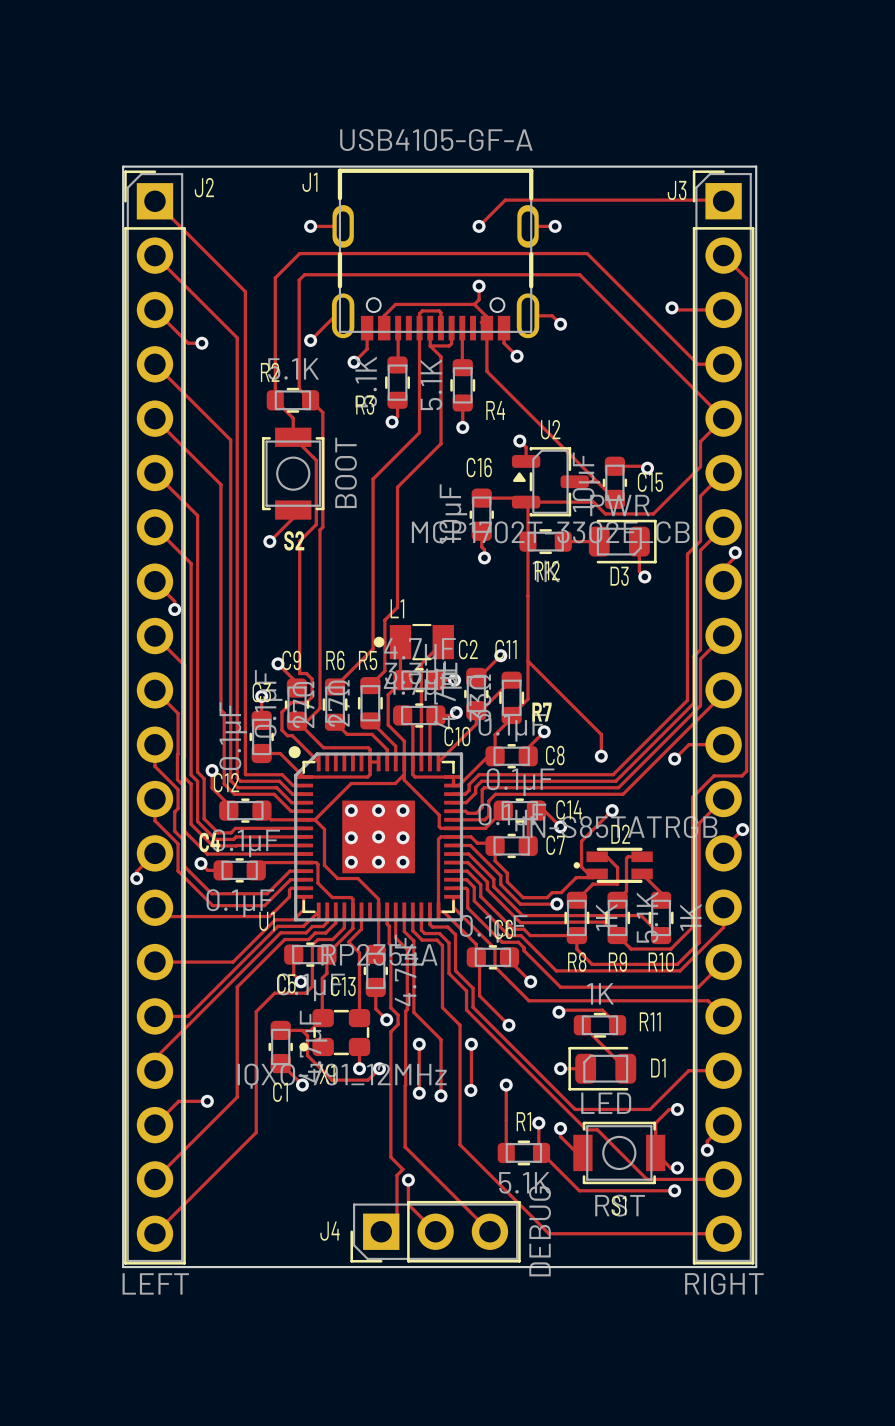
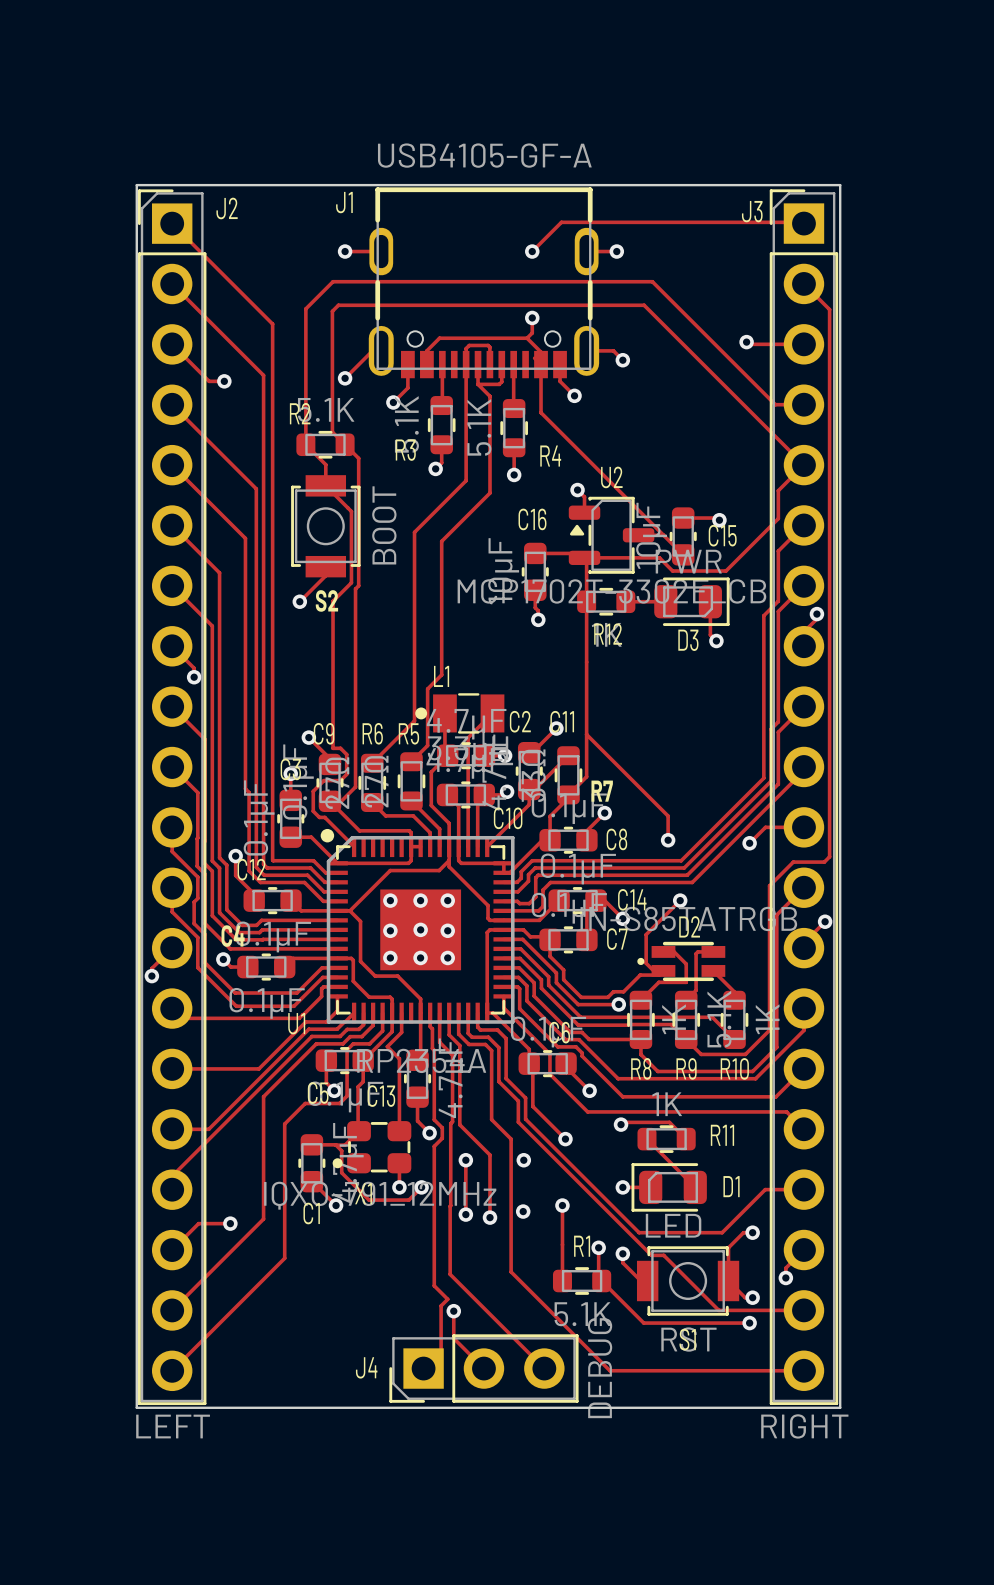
track: (470, 1044) (470, 1090) -> none

